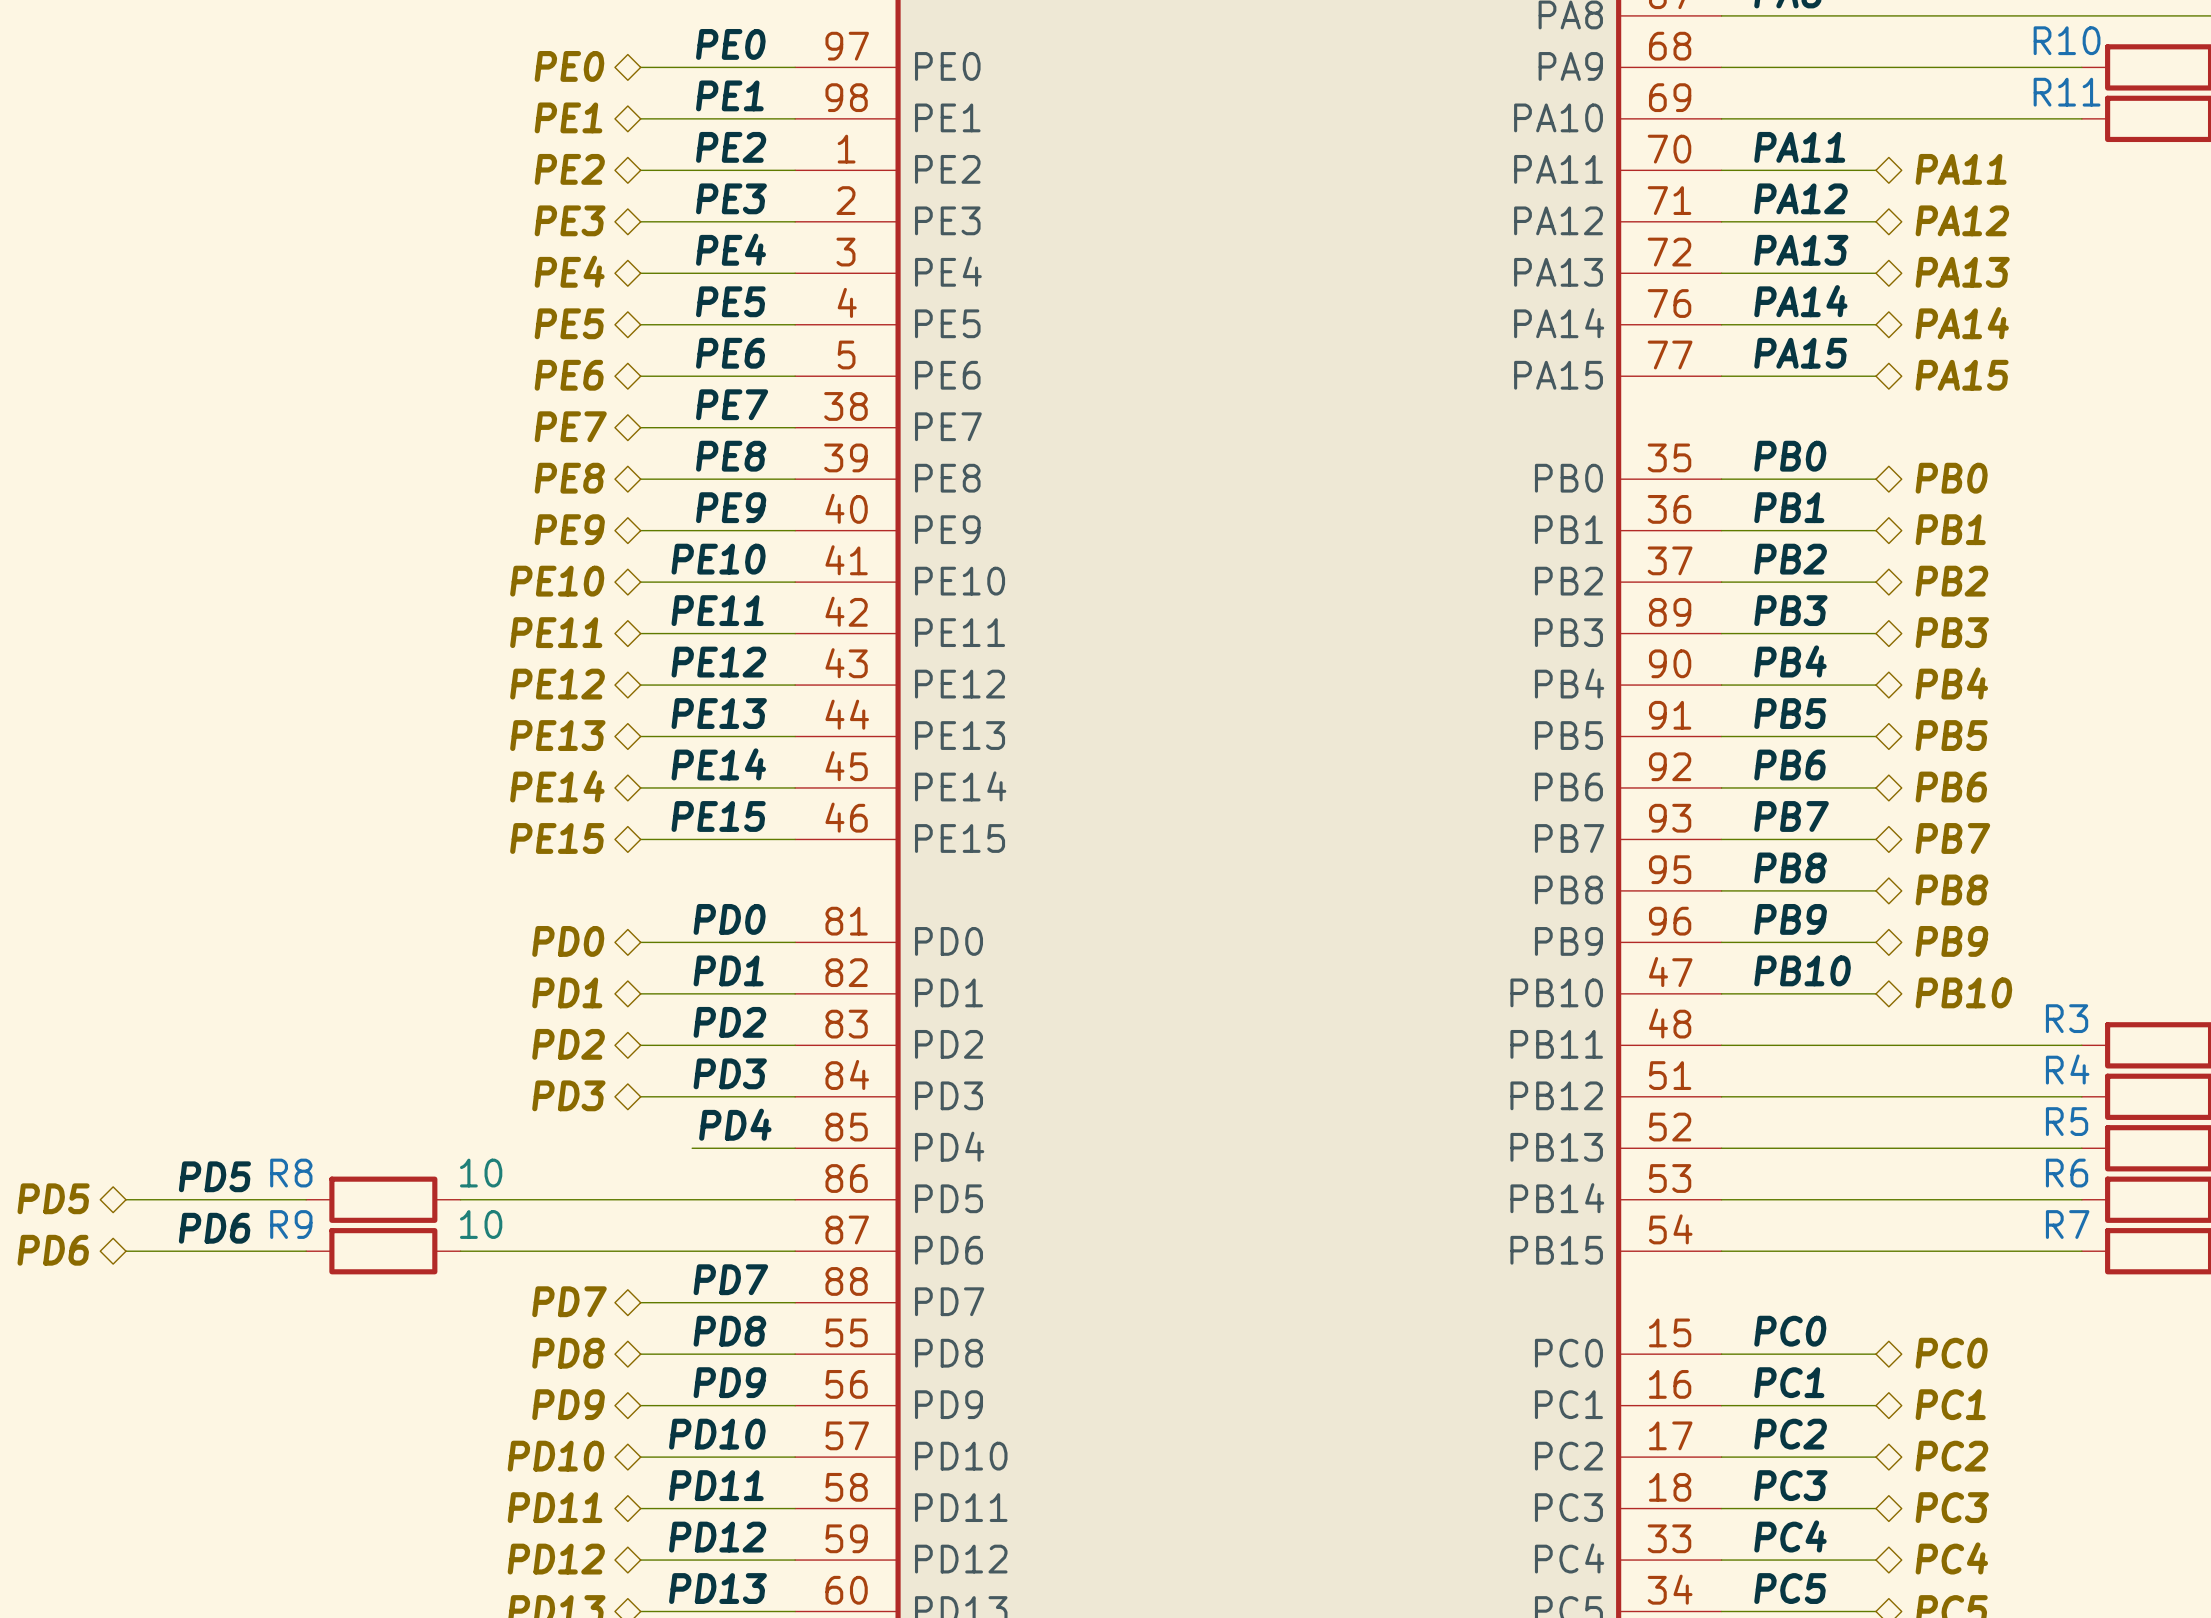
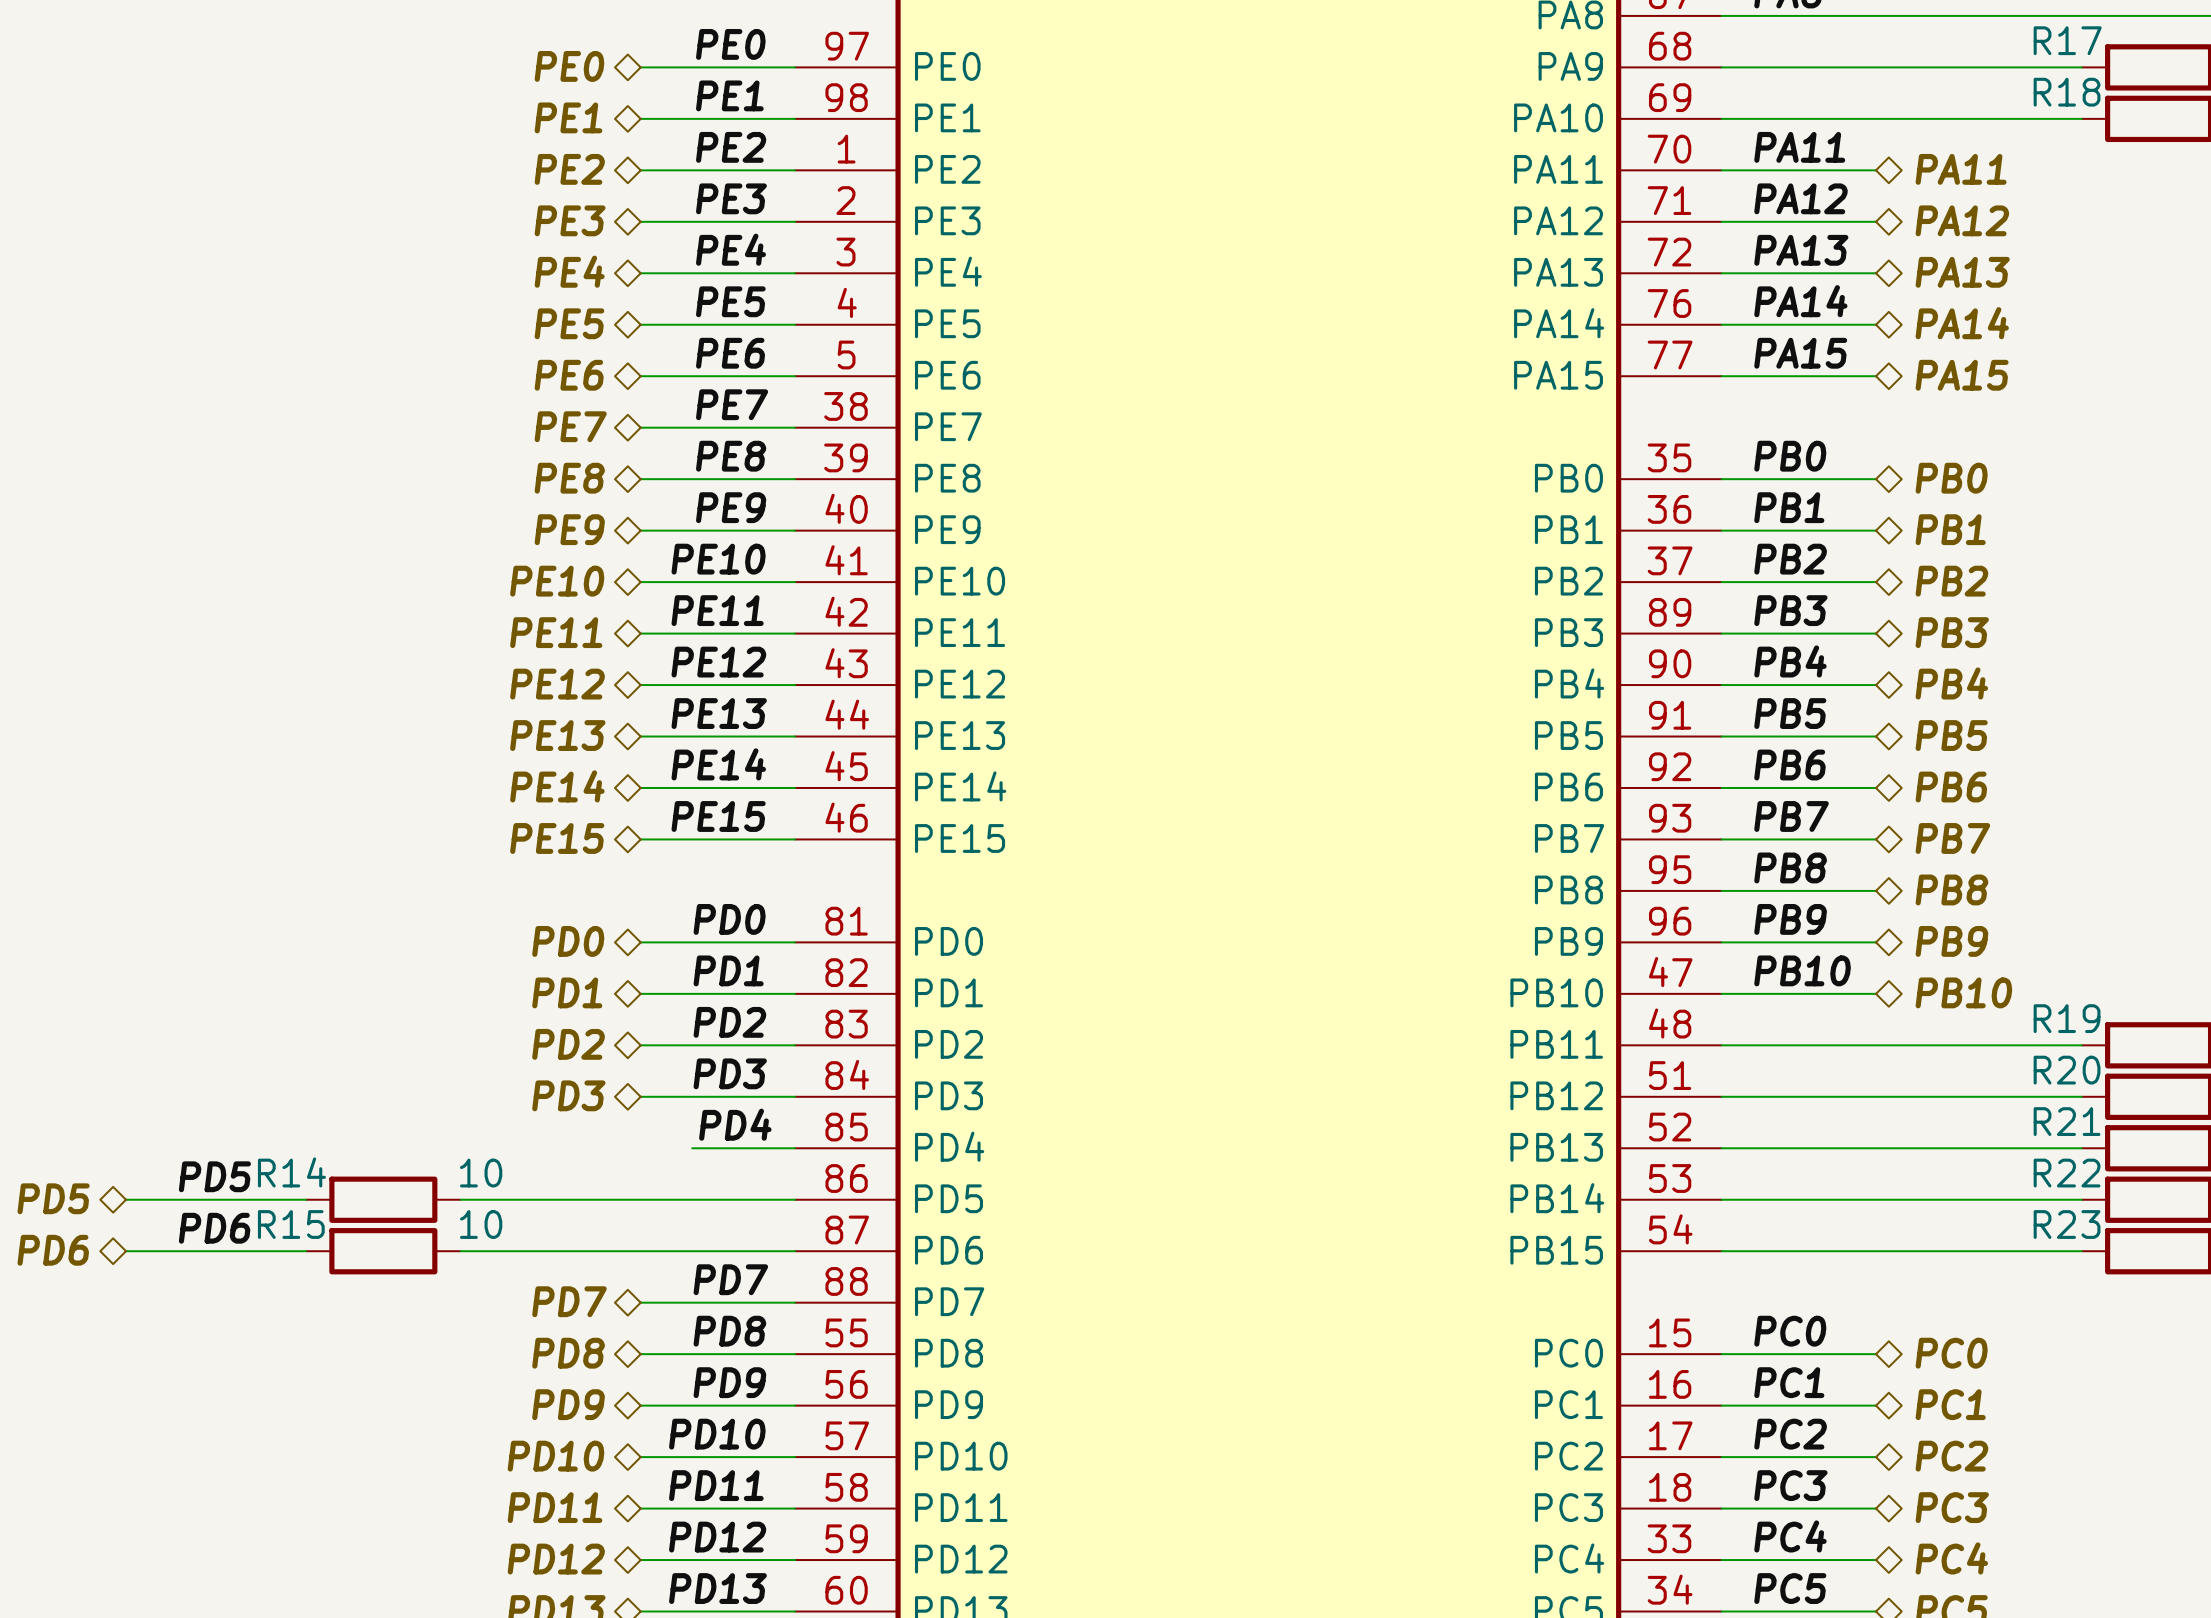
R10 name: R10 (2067, 40) -> R17 (2067, 40)
R11 name: R11 (2067, 92) -> R18 (2067, 92)
R3 name: R3 (2067, 1018) -> R19 (2067, 1018)
R4 name: R4 (2067, 1069) -> R20 (2067, 1070)
R5 name: R5 (2067, 1121) -> R21 (2067, 1121)
R8 name: R8 (291, 1173) -> R14 (291, 1172)
R6 name: R6 (2067, 1173) -> R22 (2067, 1173)
R9 name: R9 (291, 1224) -> R15 (291, 1224)
R7 name: R7 (2067, 1224) -> R23 (2067, 1224)

